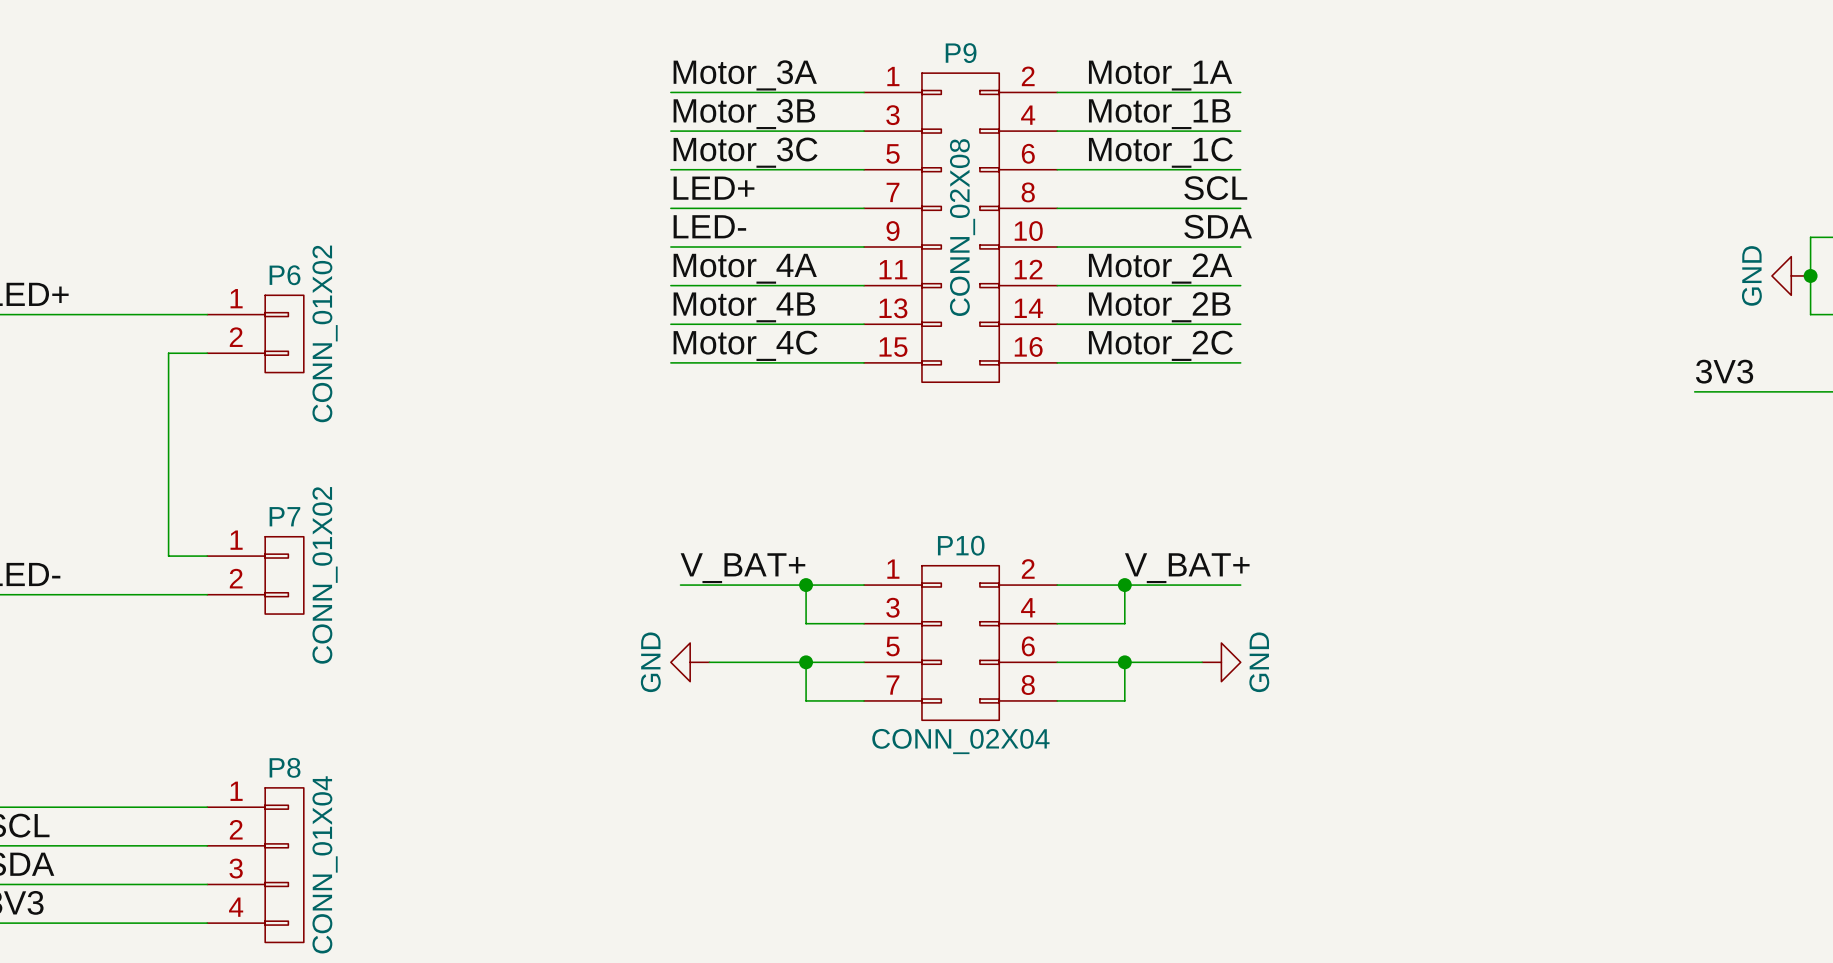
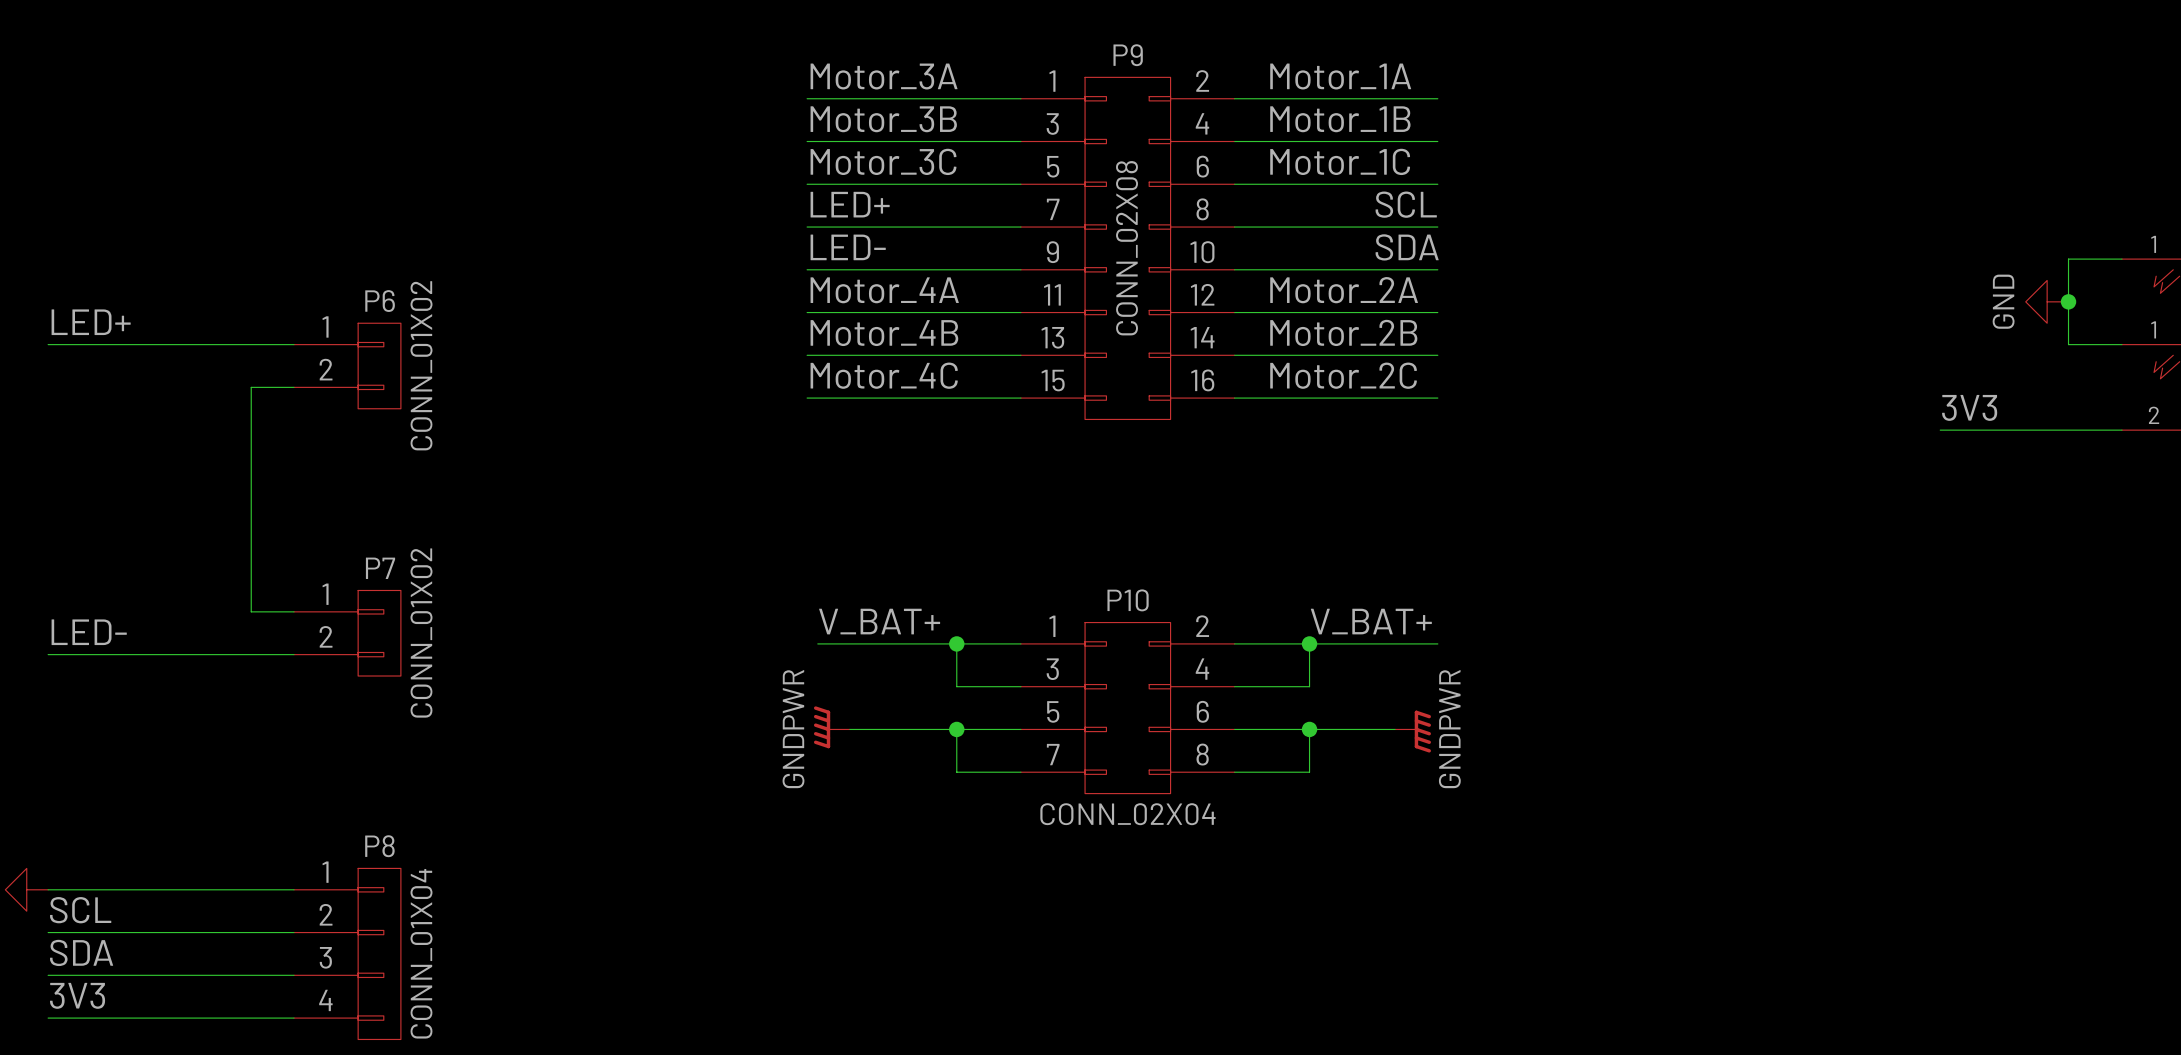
power symbol: GND (690, 662) -> GNDPWR (831, 727)
power symbol: GND (1221, 662) -> GNDPWR (1413, 731)

